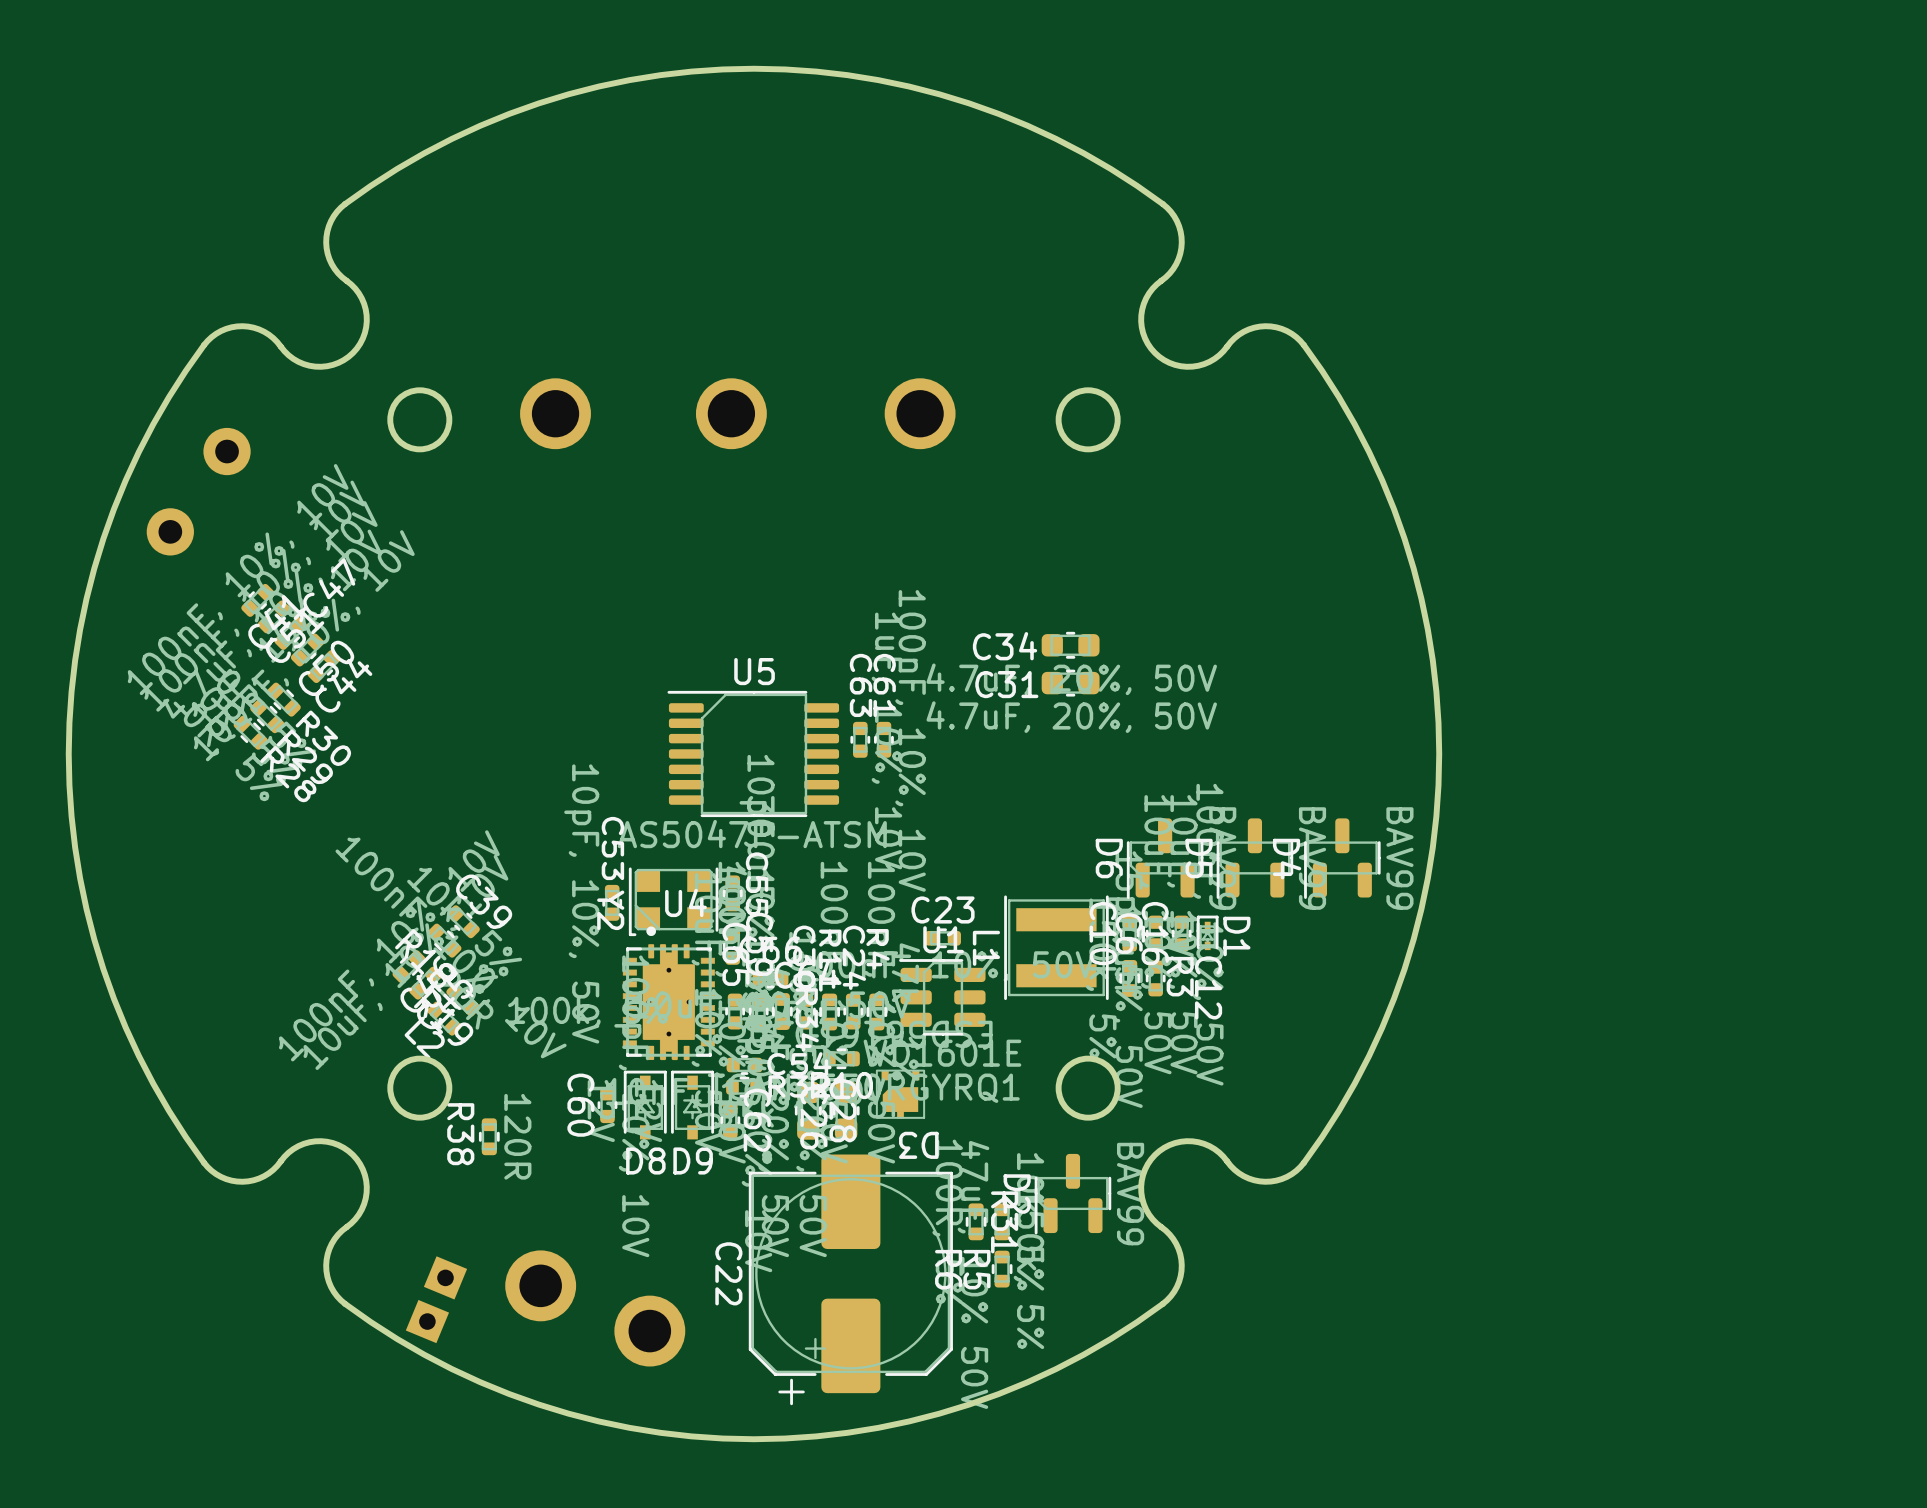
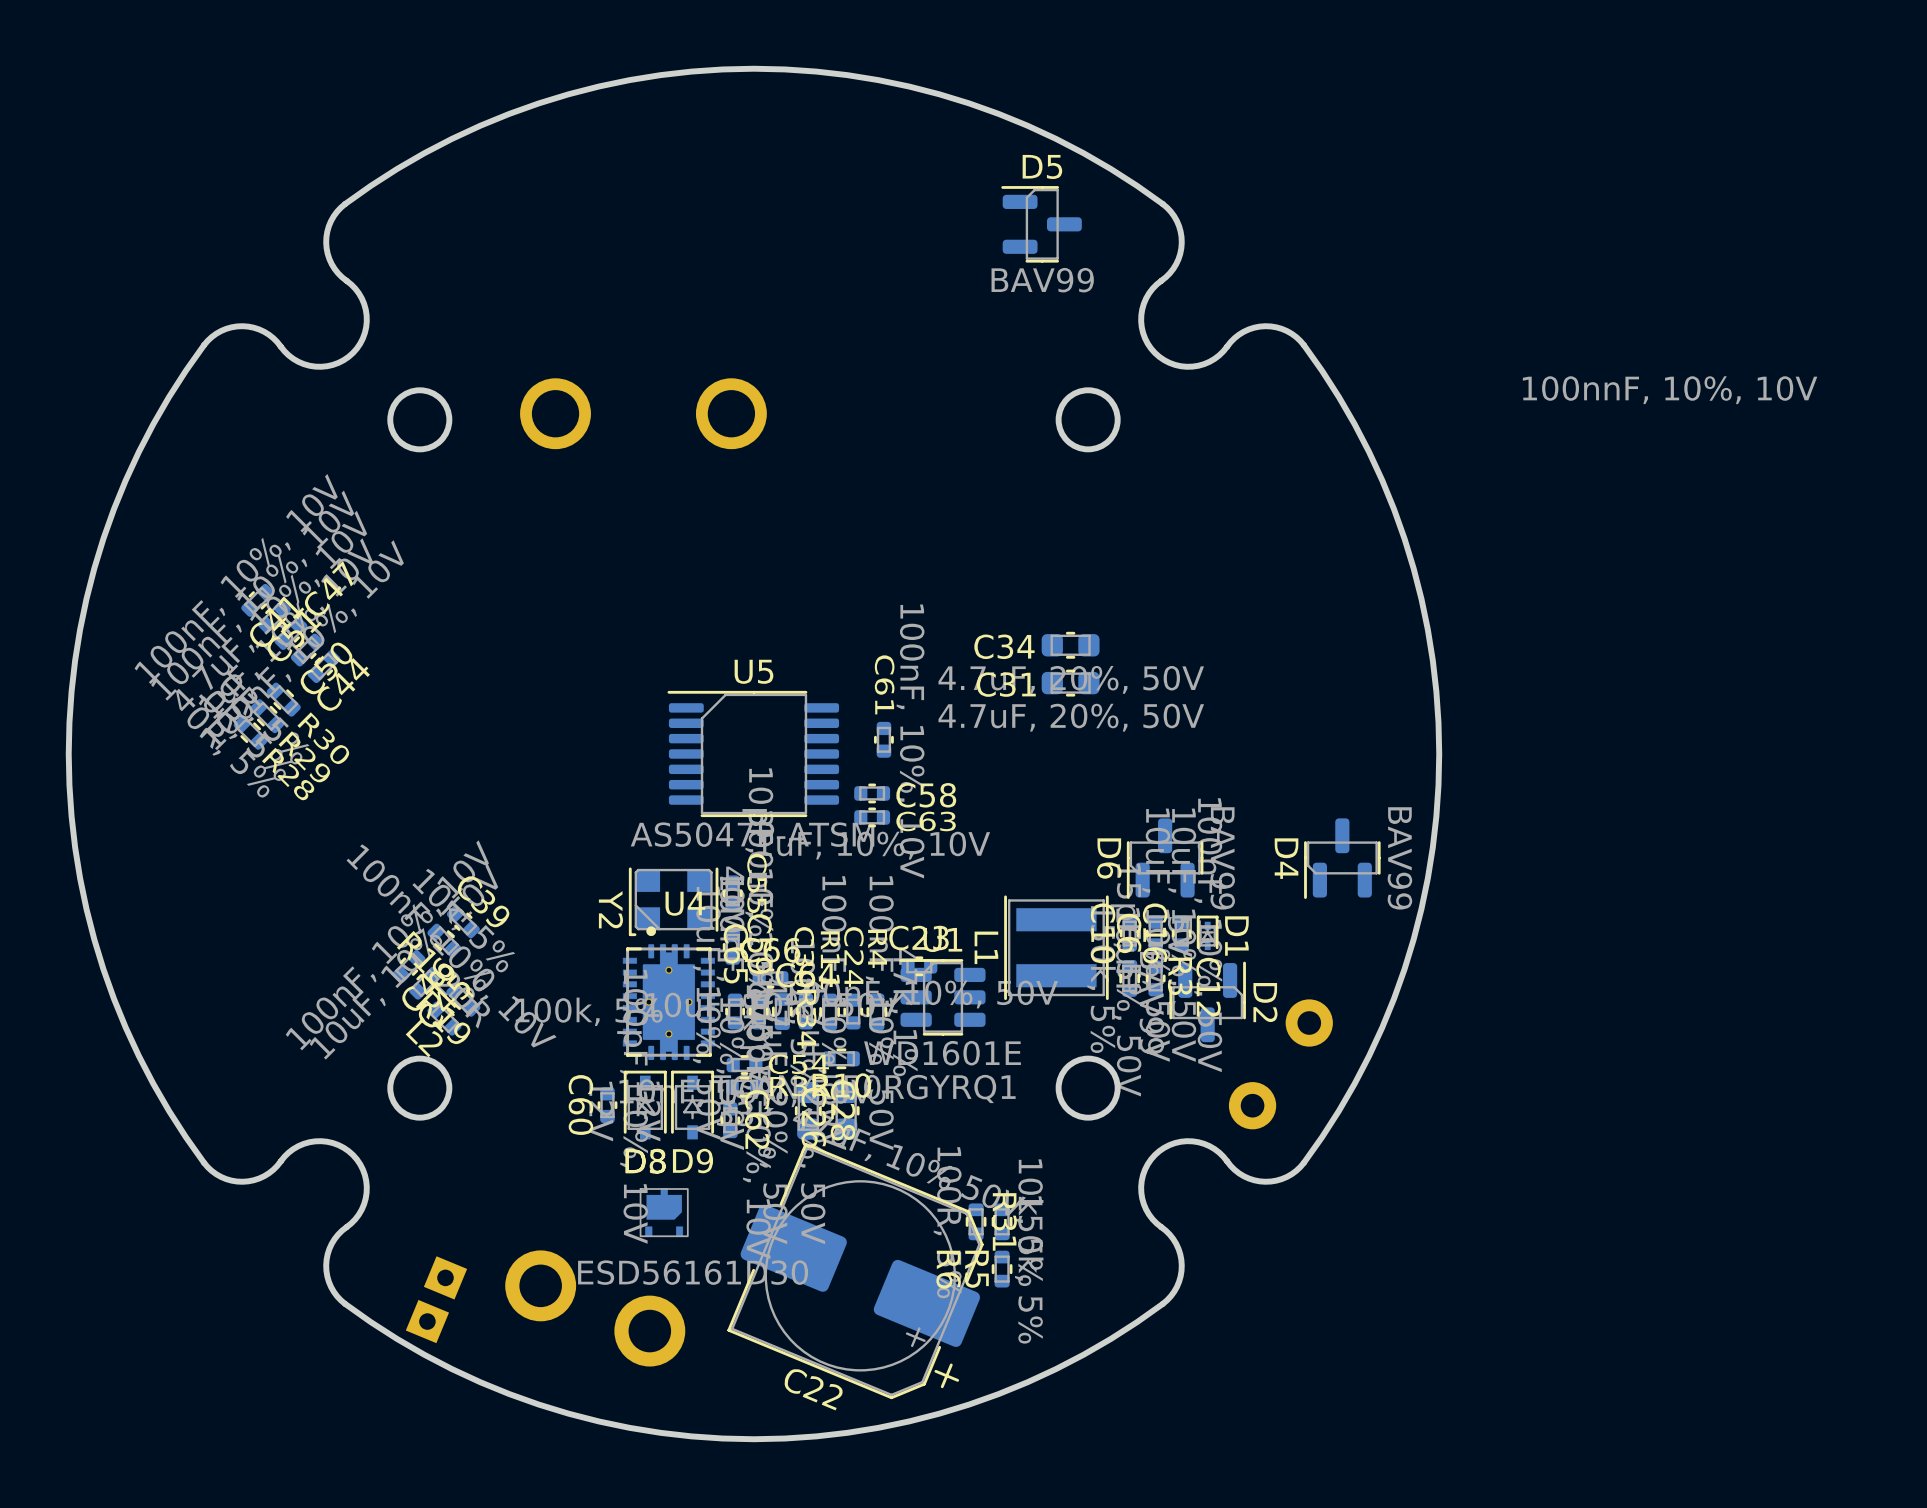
part: (920, 413) -> none
part: (227, 451) -> none
part: (170, 531) -> none
C63 rotation: 0° (860, 739) -> 90° clockwise (872, 817)
C63 position: (860, 739) -> (872, 817)
C58: none -> 100nnF, 10%, 10V (872, 793)
D5 rotation: 0° (1254, 858) -> 90° clockwise (1041, 224)
D5 position: (1254, 858) -> (1041, 224)
C53: 10pF, 10%, 50V (612, 902) -> none
C23 position: (943, 938) -> (919, 966)
part: none -> (1309, 1023)
D3 rotation: 0° (900, 1094) -> 180° (664, 1212)
D3 position: (900, 1094) -> (664, 1212)
part: none -> (1252, 1105)
R38: 120R (489, 1136) -> none
D2 rotation: 0° (1072, 1194) -> 180° (1207, 1001)
D2 position: (1072, 1194) -> (1207, 1001)
C22 rotation: 0° (850, 1279) -> 67.5° counterclockwise (855, 1271)

